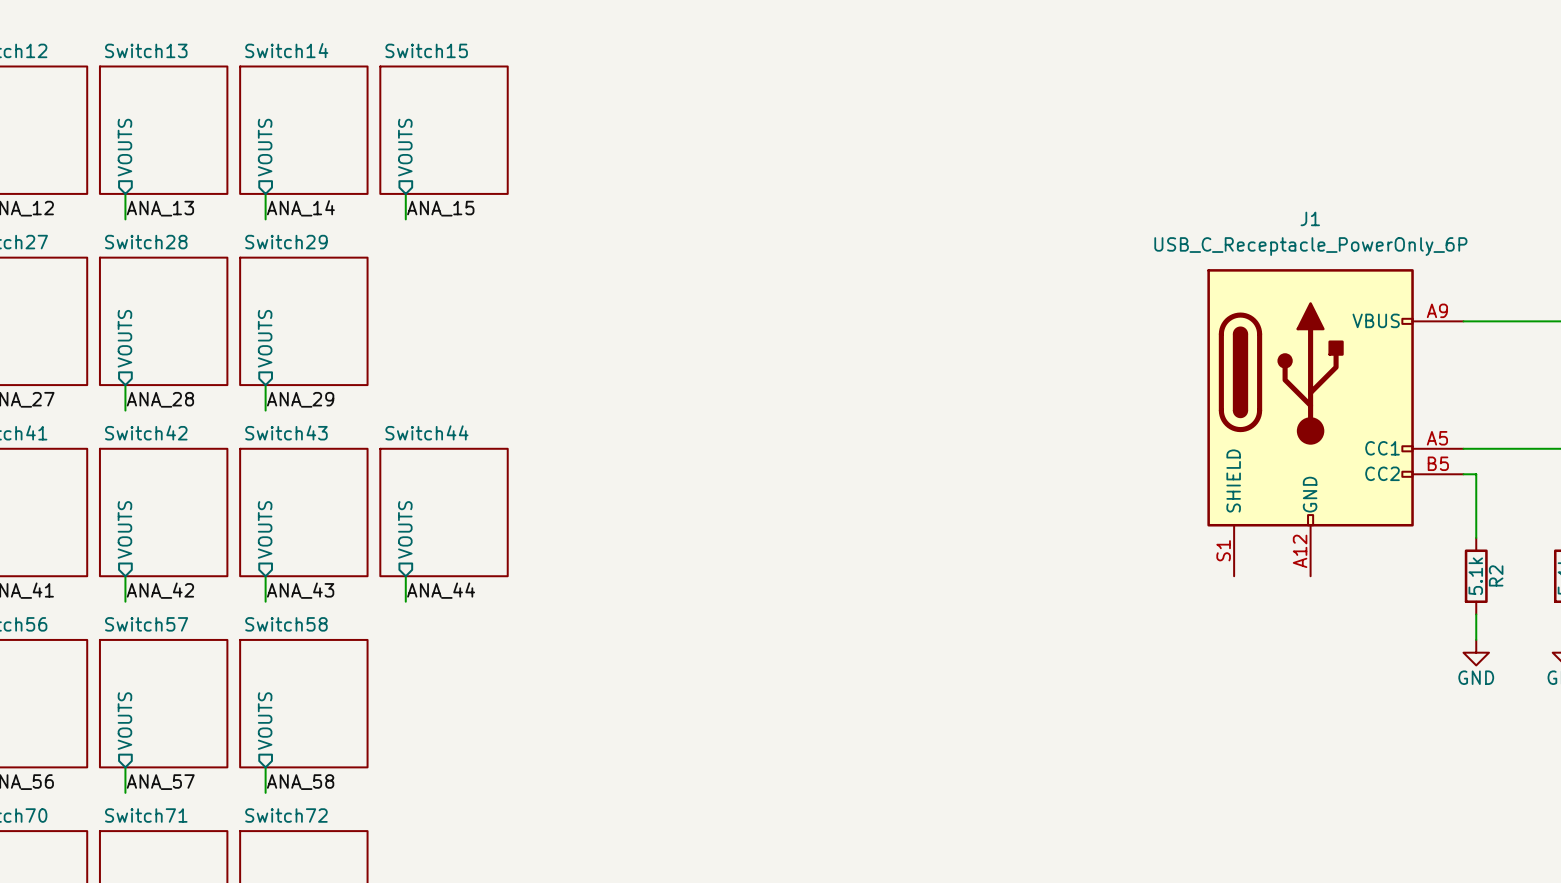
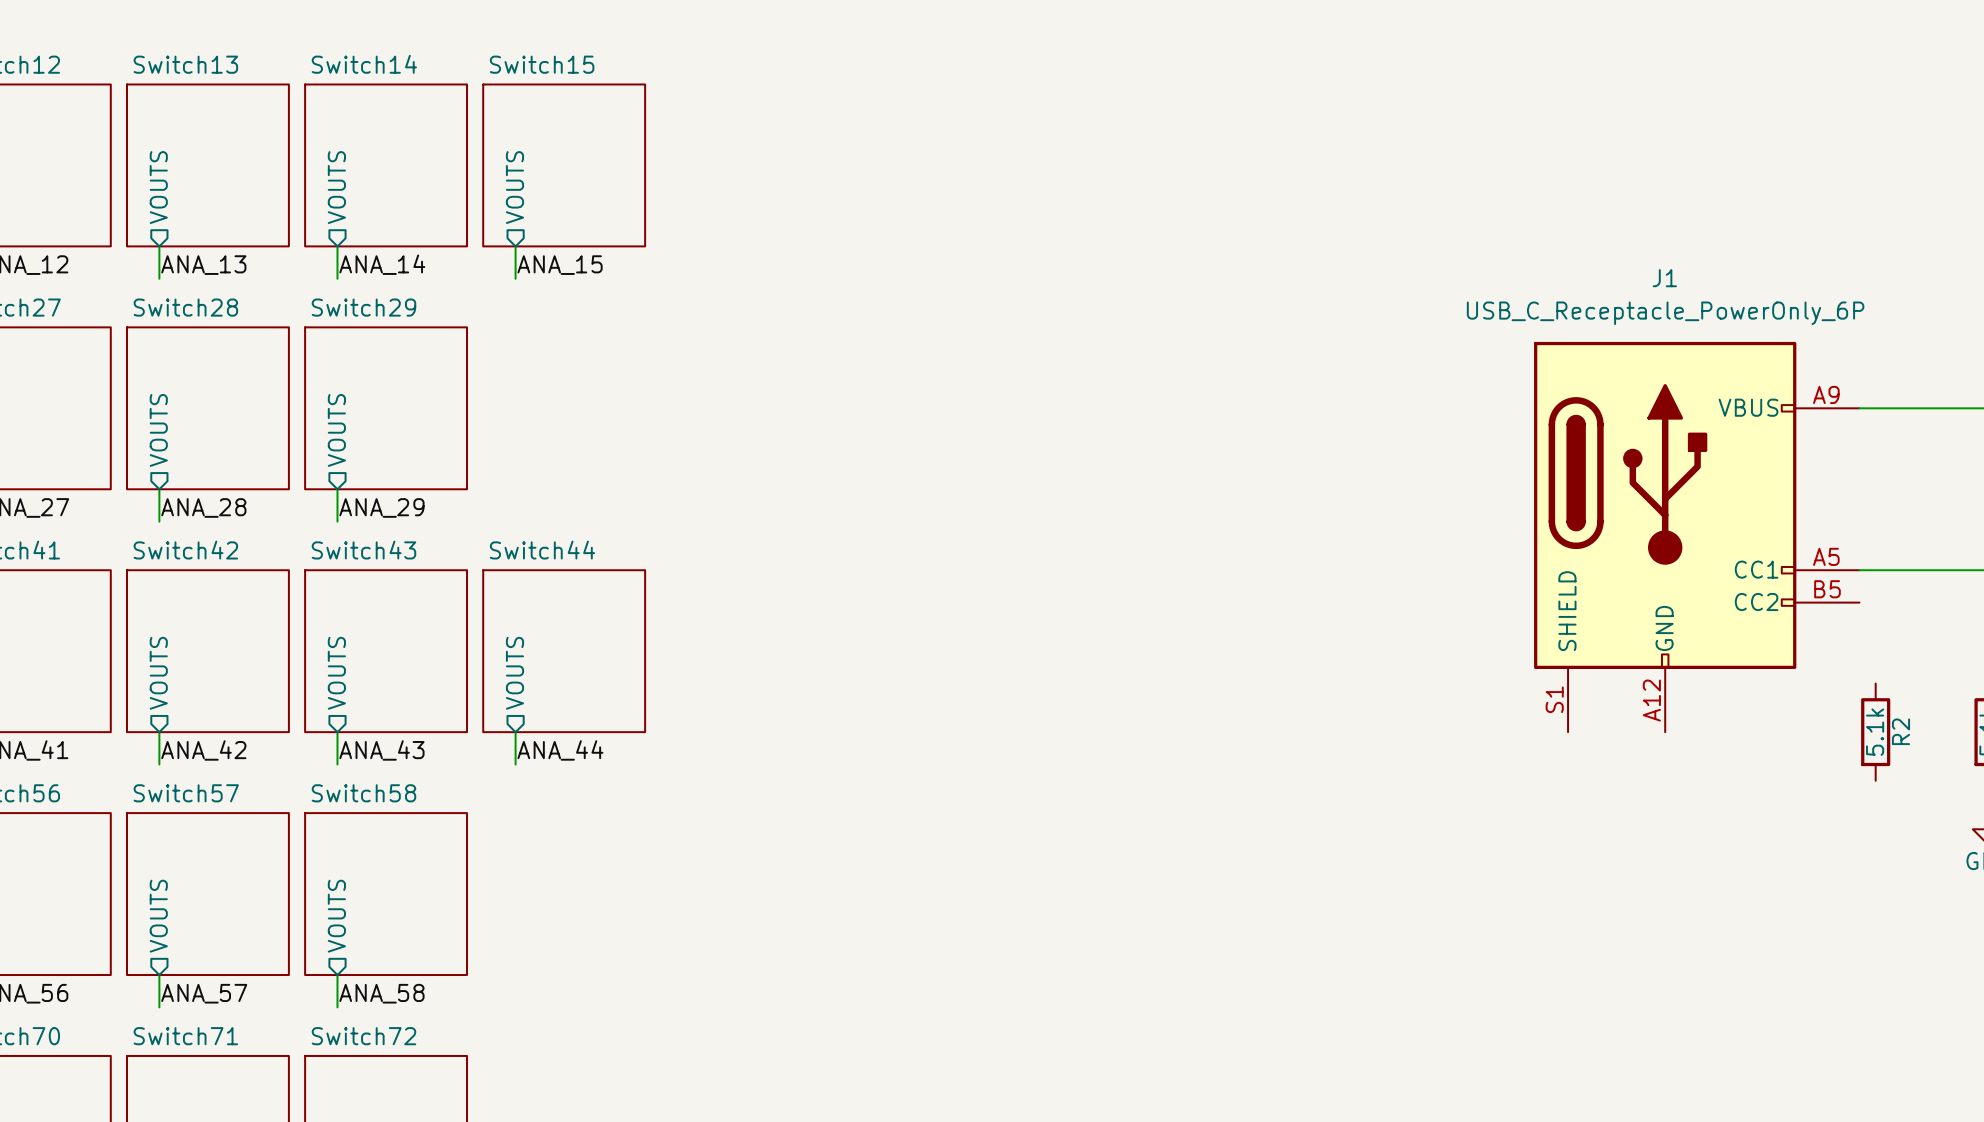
wire: (1463, 474) (1476, 474) (1476, 538) -> none
wire: (1476, 614) (1476, 639) -> none
power symbol: GND (1476, 652) -> none

